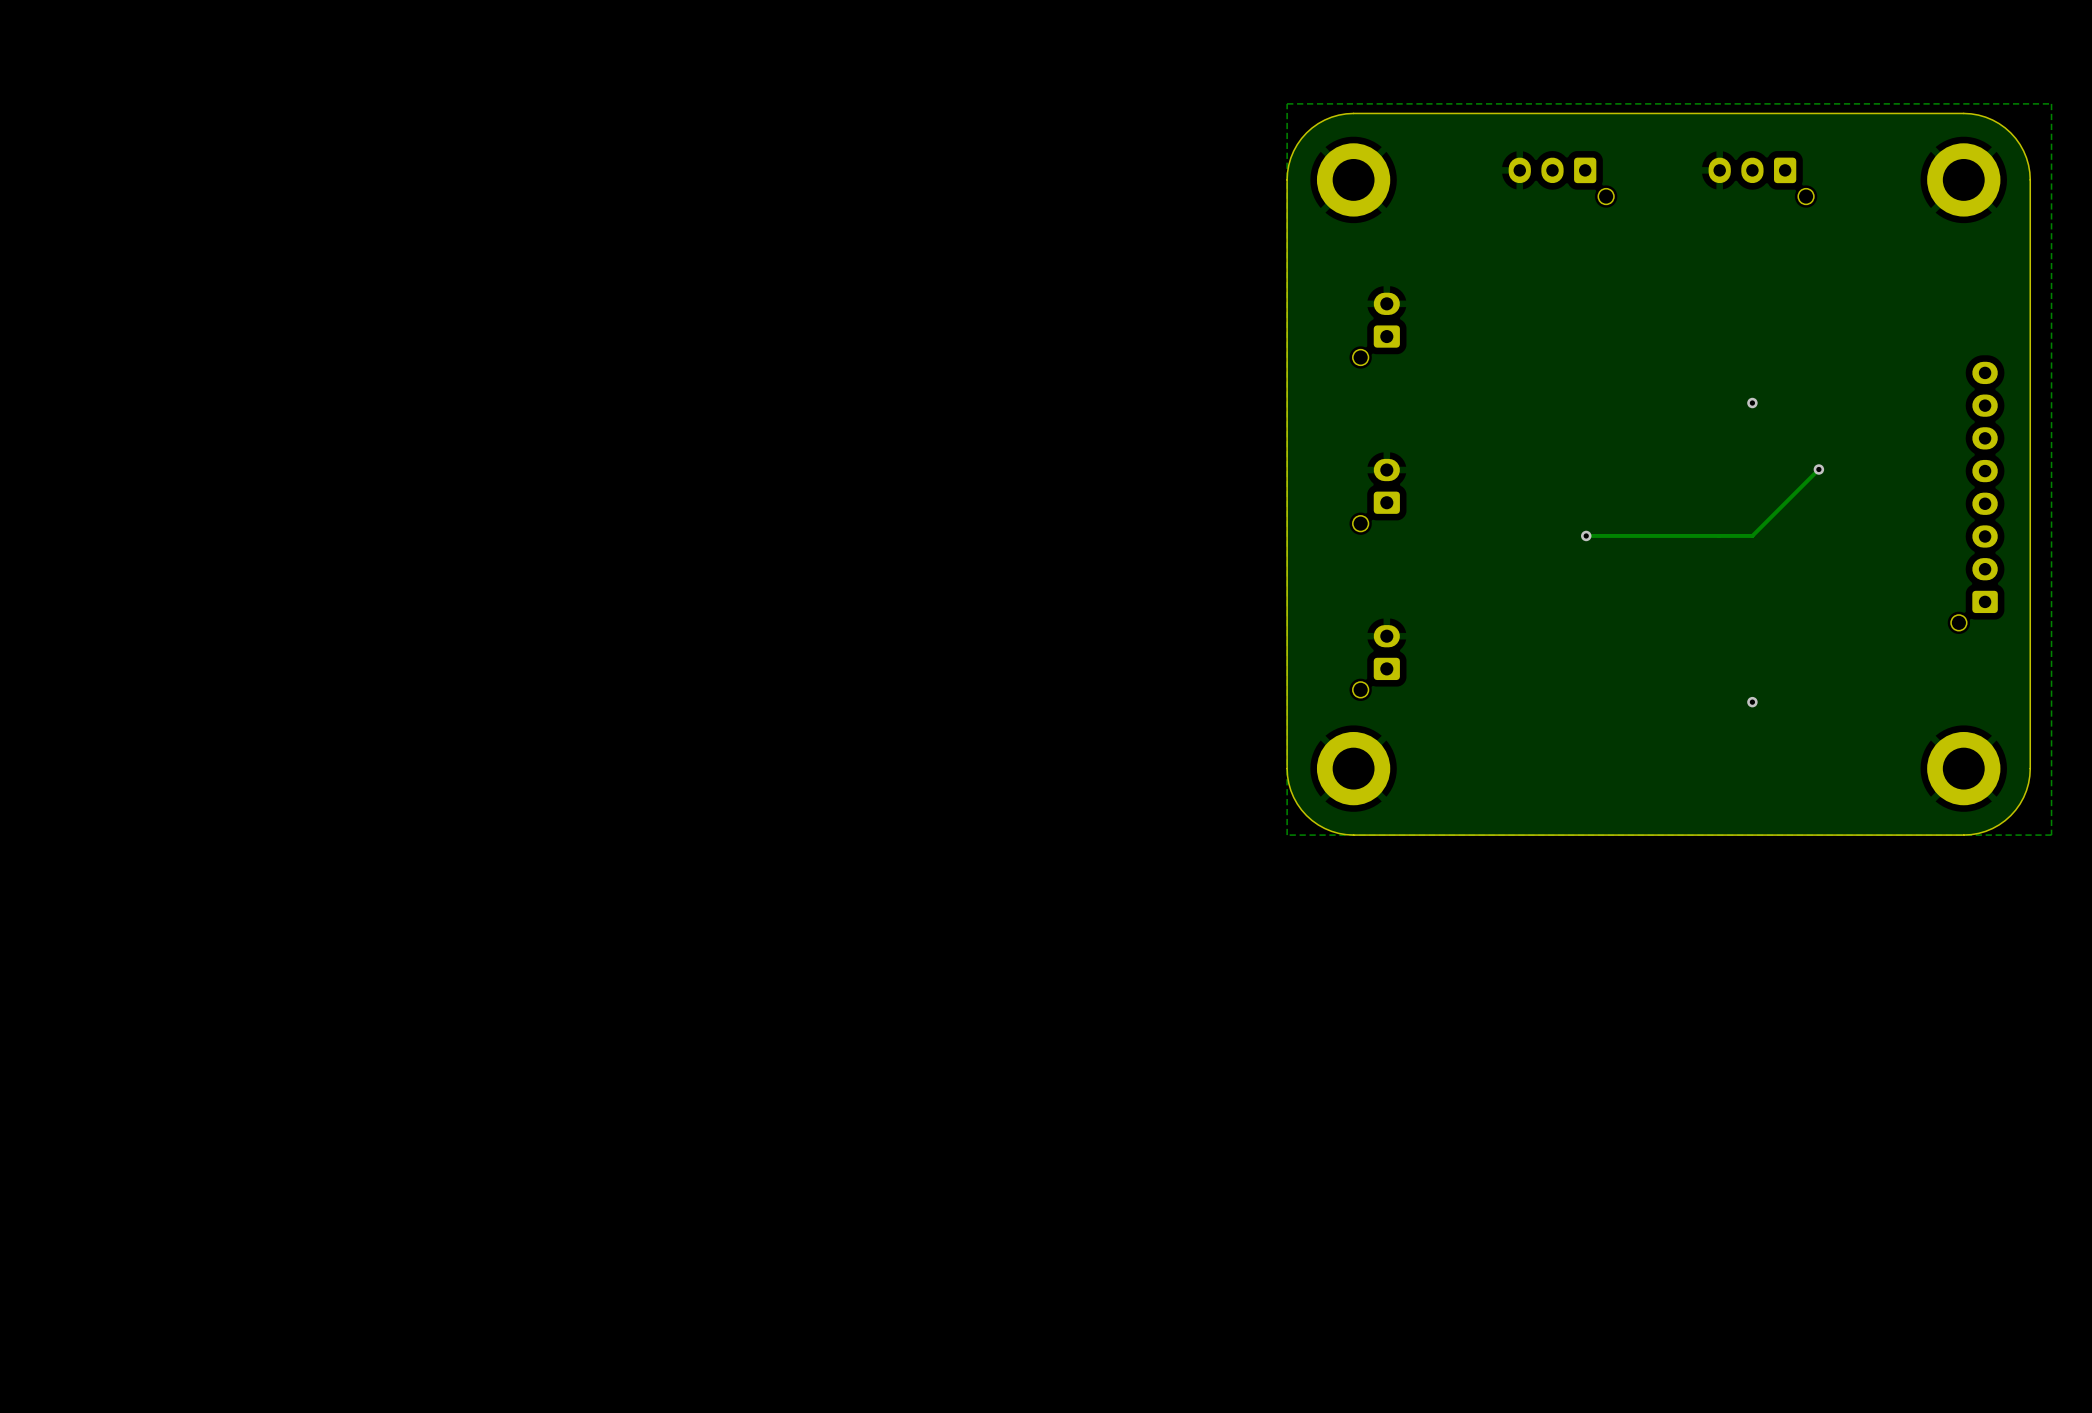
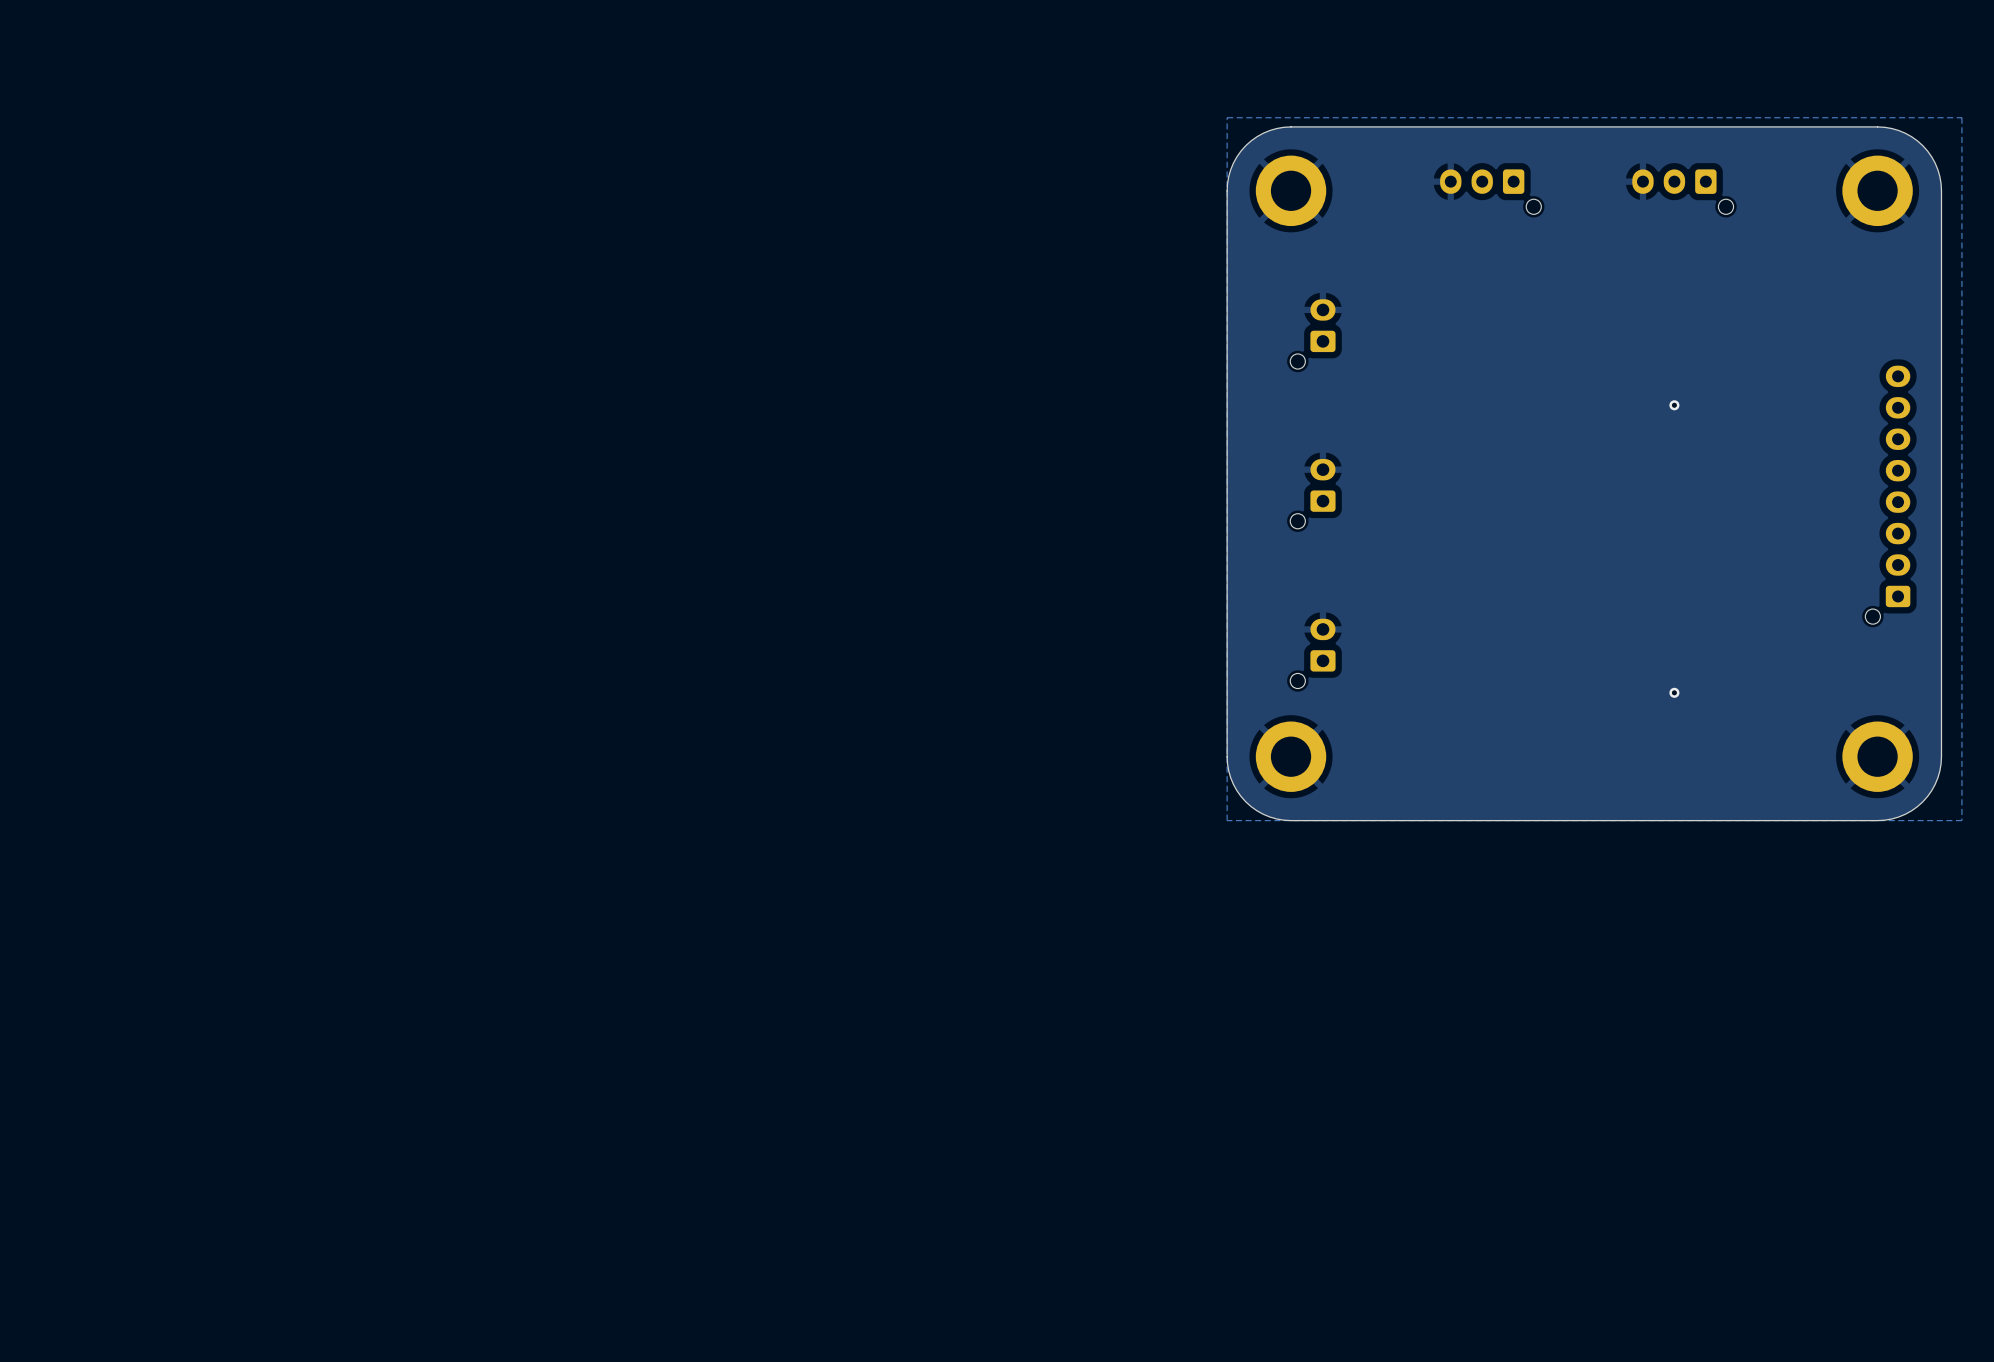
track: (1818, 469) (1752, 535) (1586, 535) -> none
via: (1818, 469) -> none
via: (1586, 535) -> none

